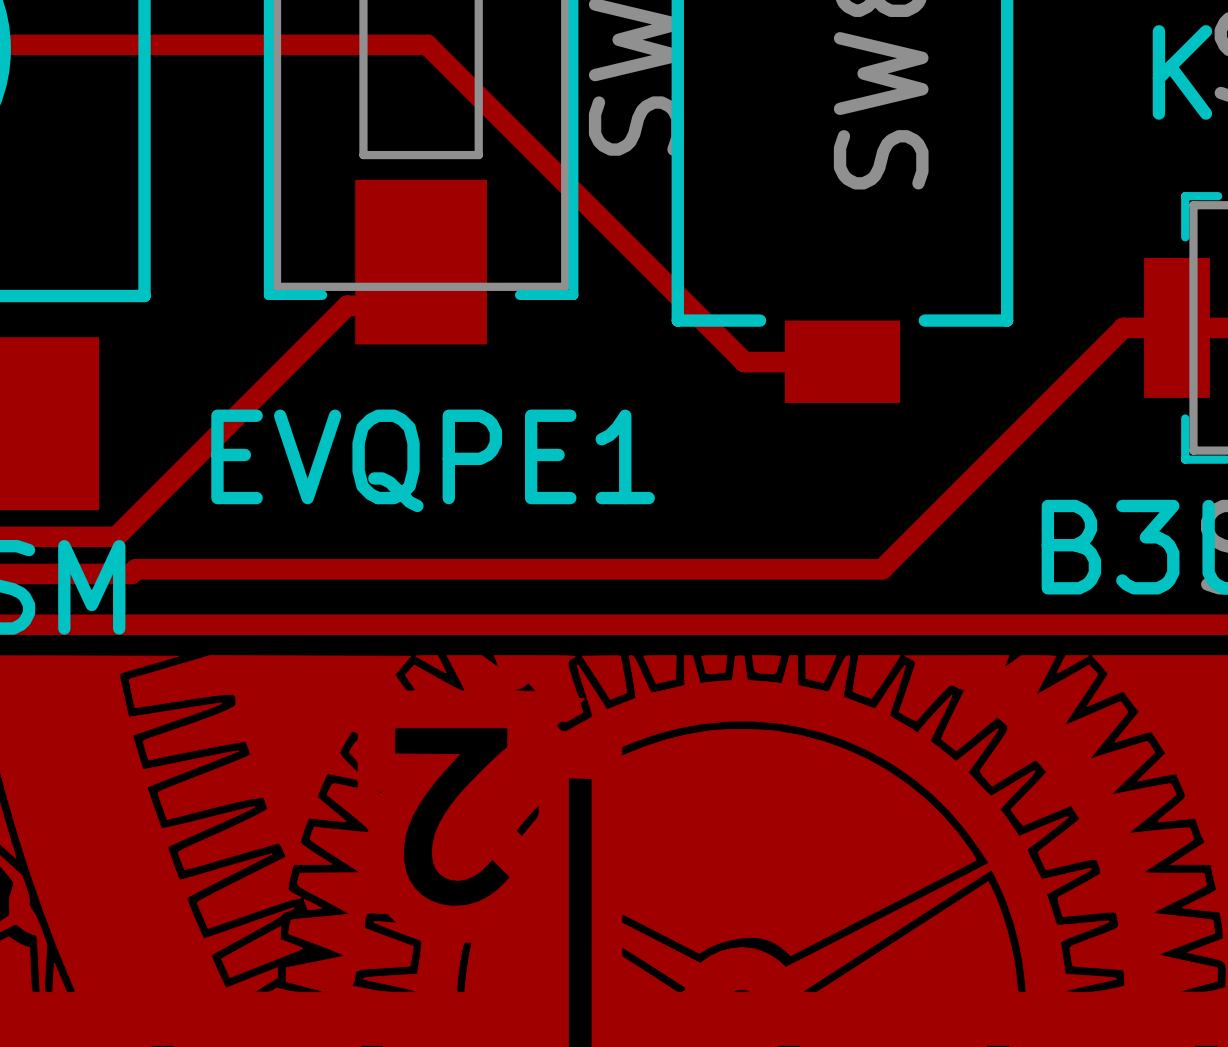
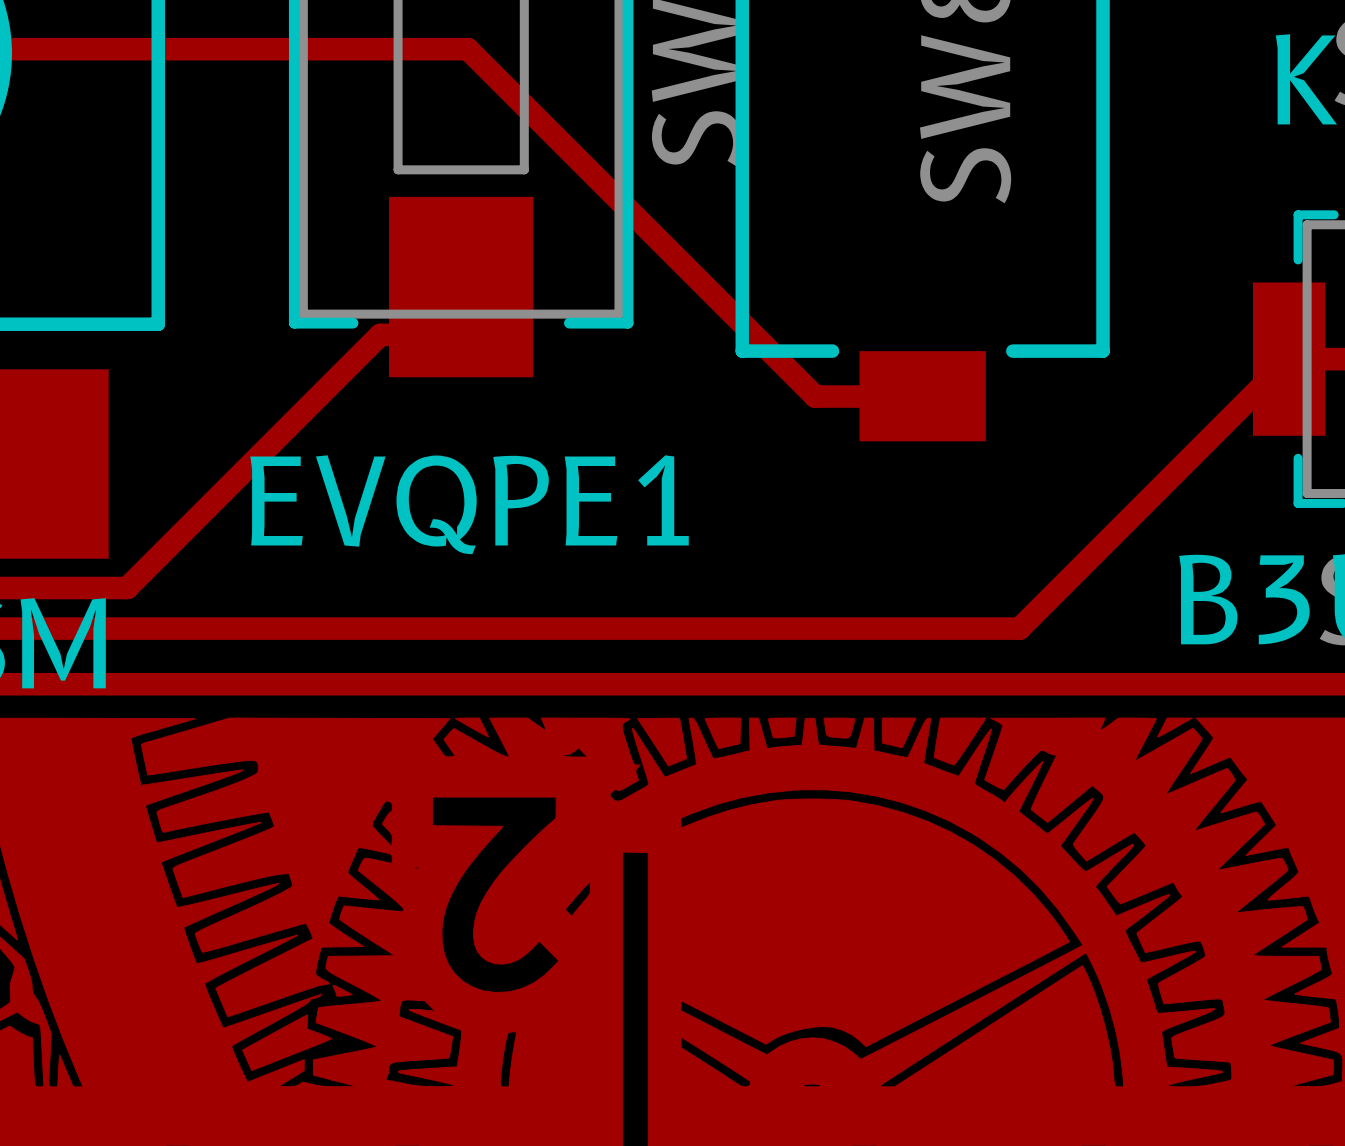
track: (1177, 327) (1123, 327) (882, 569) (136, 569) (131, 573) -> (1289, 359) (1019, 628) (143, 628)

